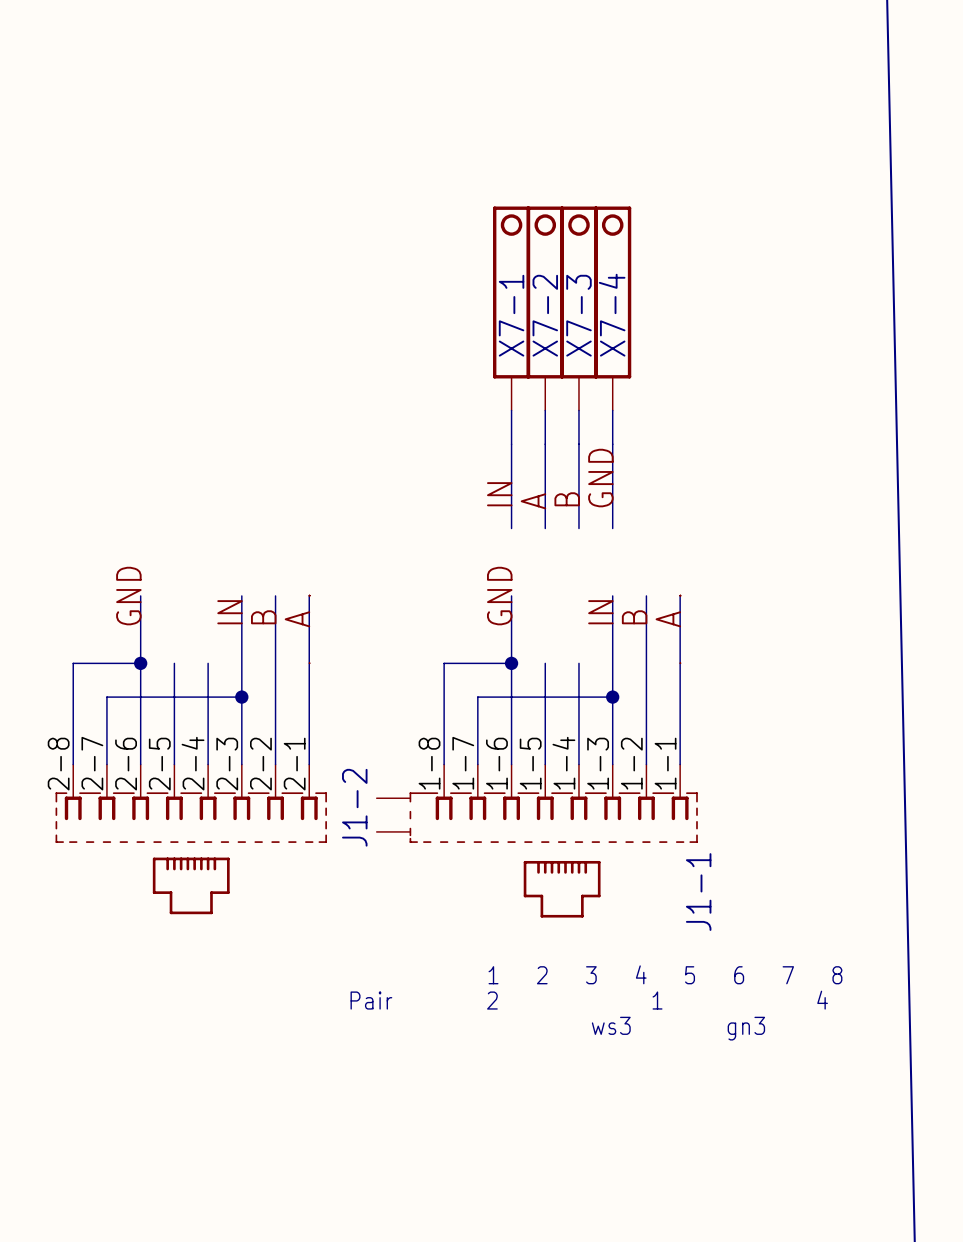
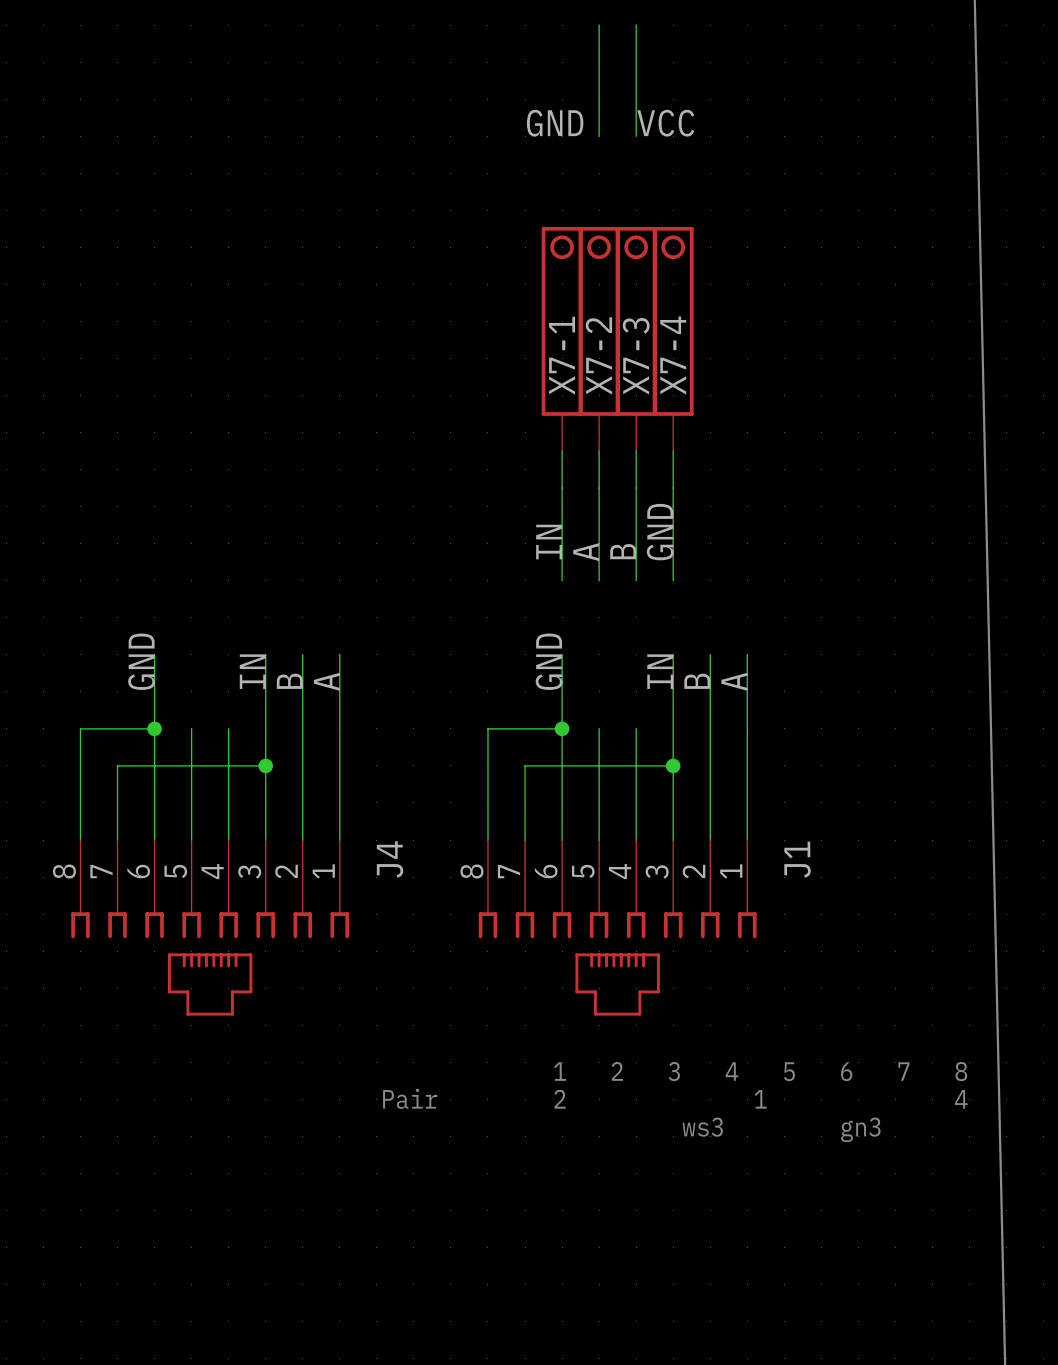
wire: none -> (599, 25) (599, 136)
wire: none -> (636, 25) (636, 136)
label: none -> GND (555, 123)
label: none -> VCC (665, 123)
J1-2: (191, 839) -> none
J1-1: (537, 841) -> none
J4: none -> (210, 927)
J1: none -> (617, 927)

